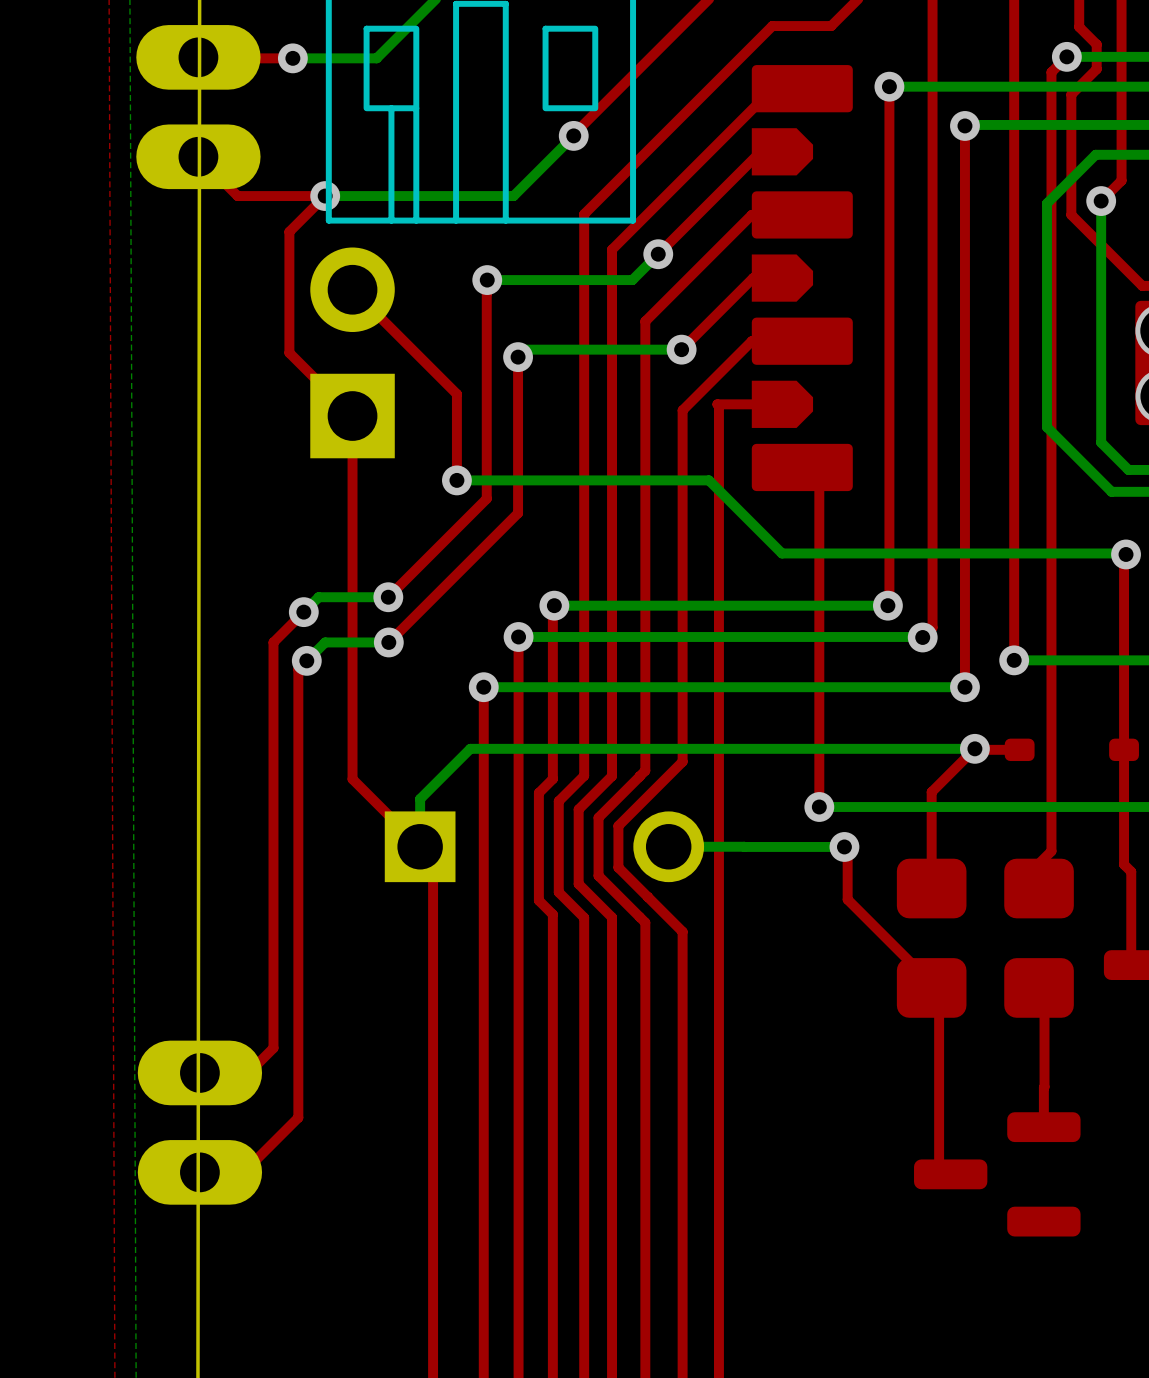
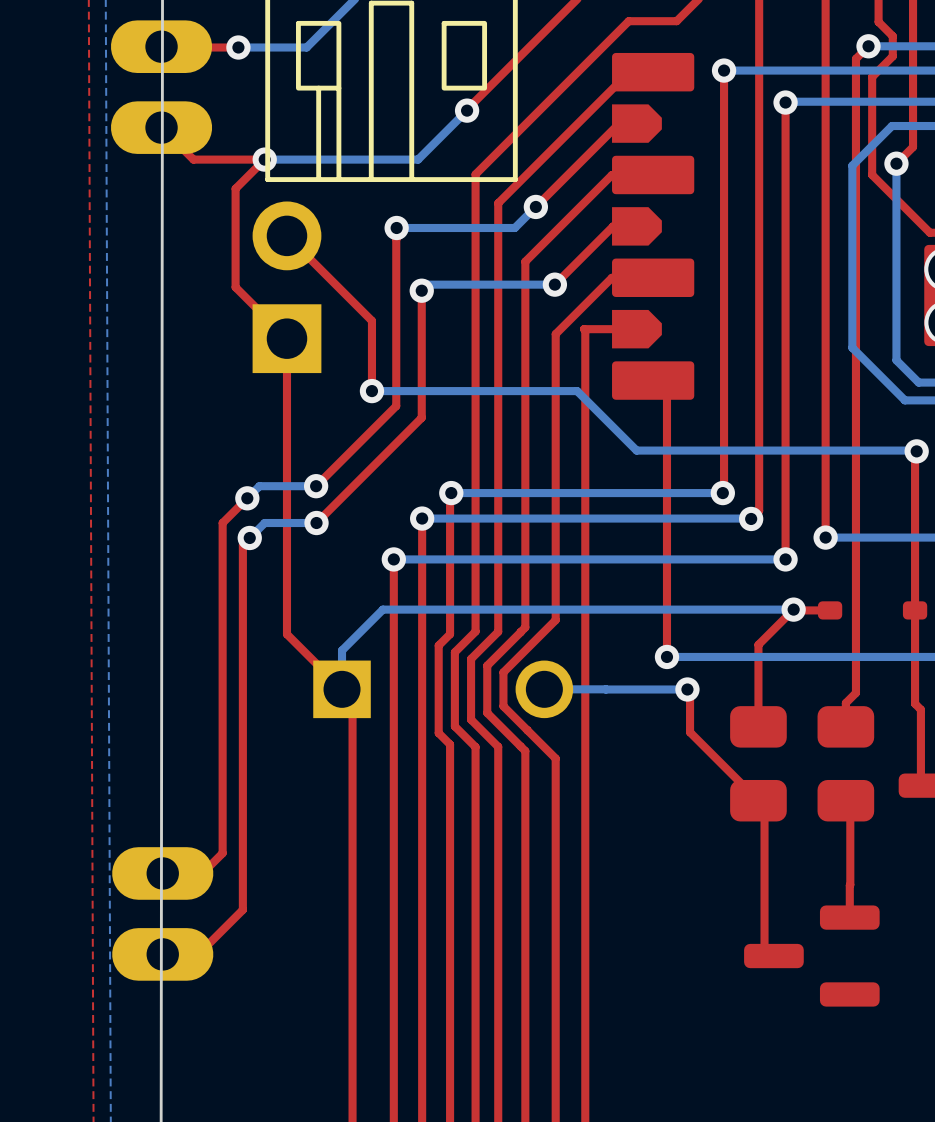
part footprint: [896, 858, 967, 1018] -> [730, 706, 787, 822]
part footprint: [1004, 858, 1074, 1018] -> [817, 706, 875, 822]

